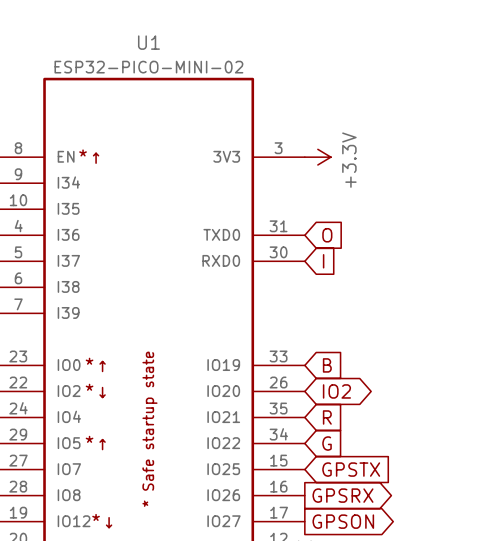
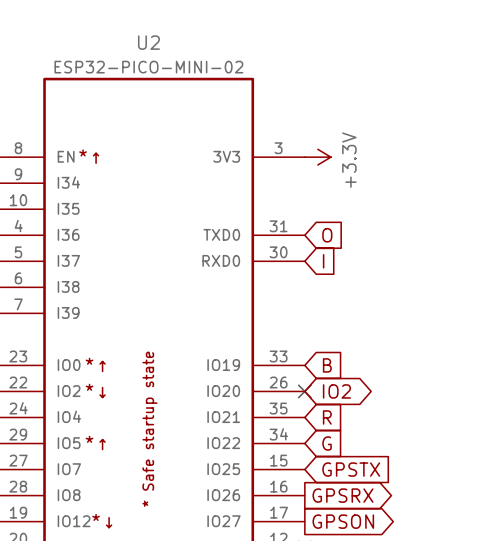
U1 name: U1 (148, 42) -> U2 (148, 42)
no-connect mark: none -> (304, 391)

